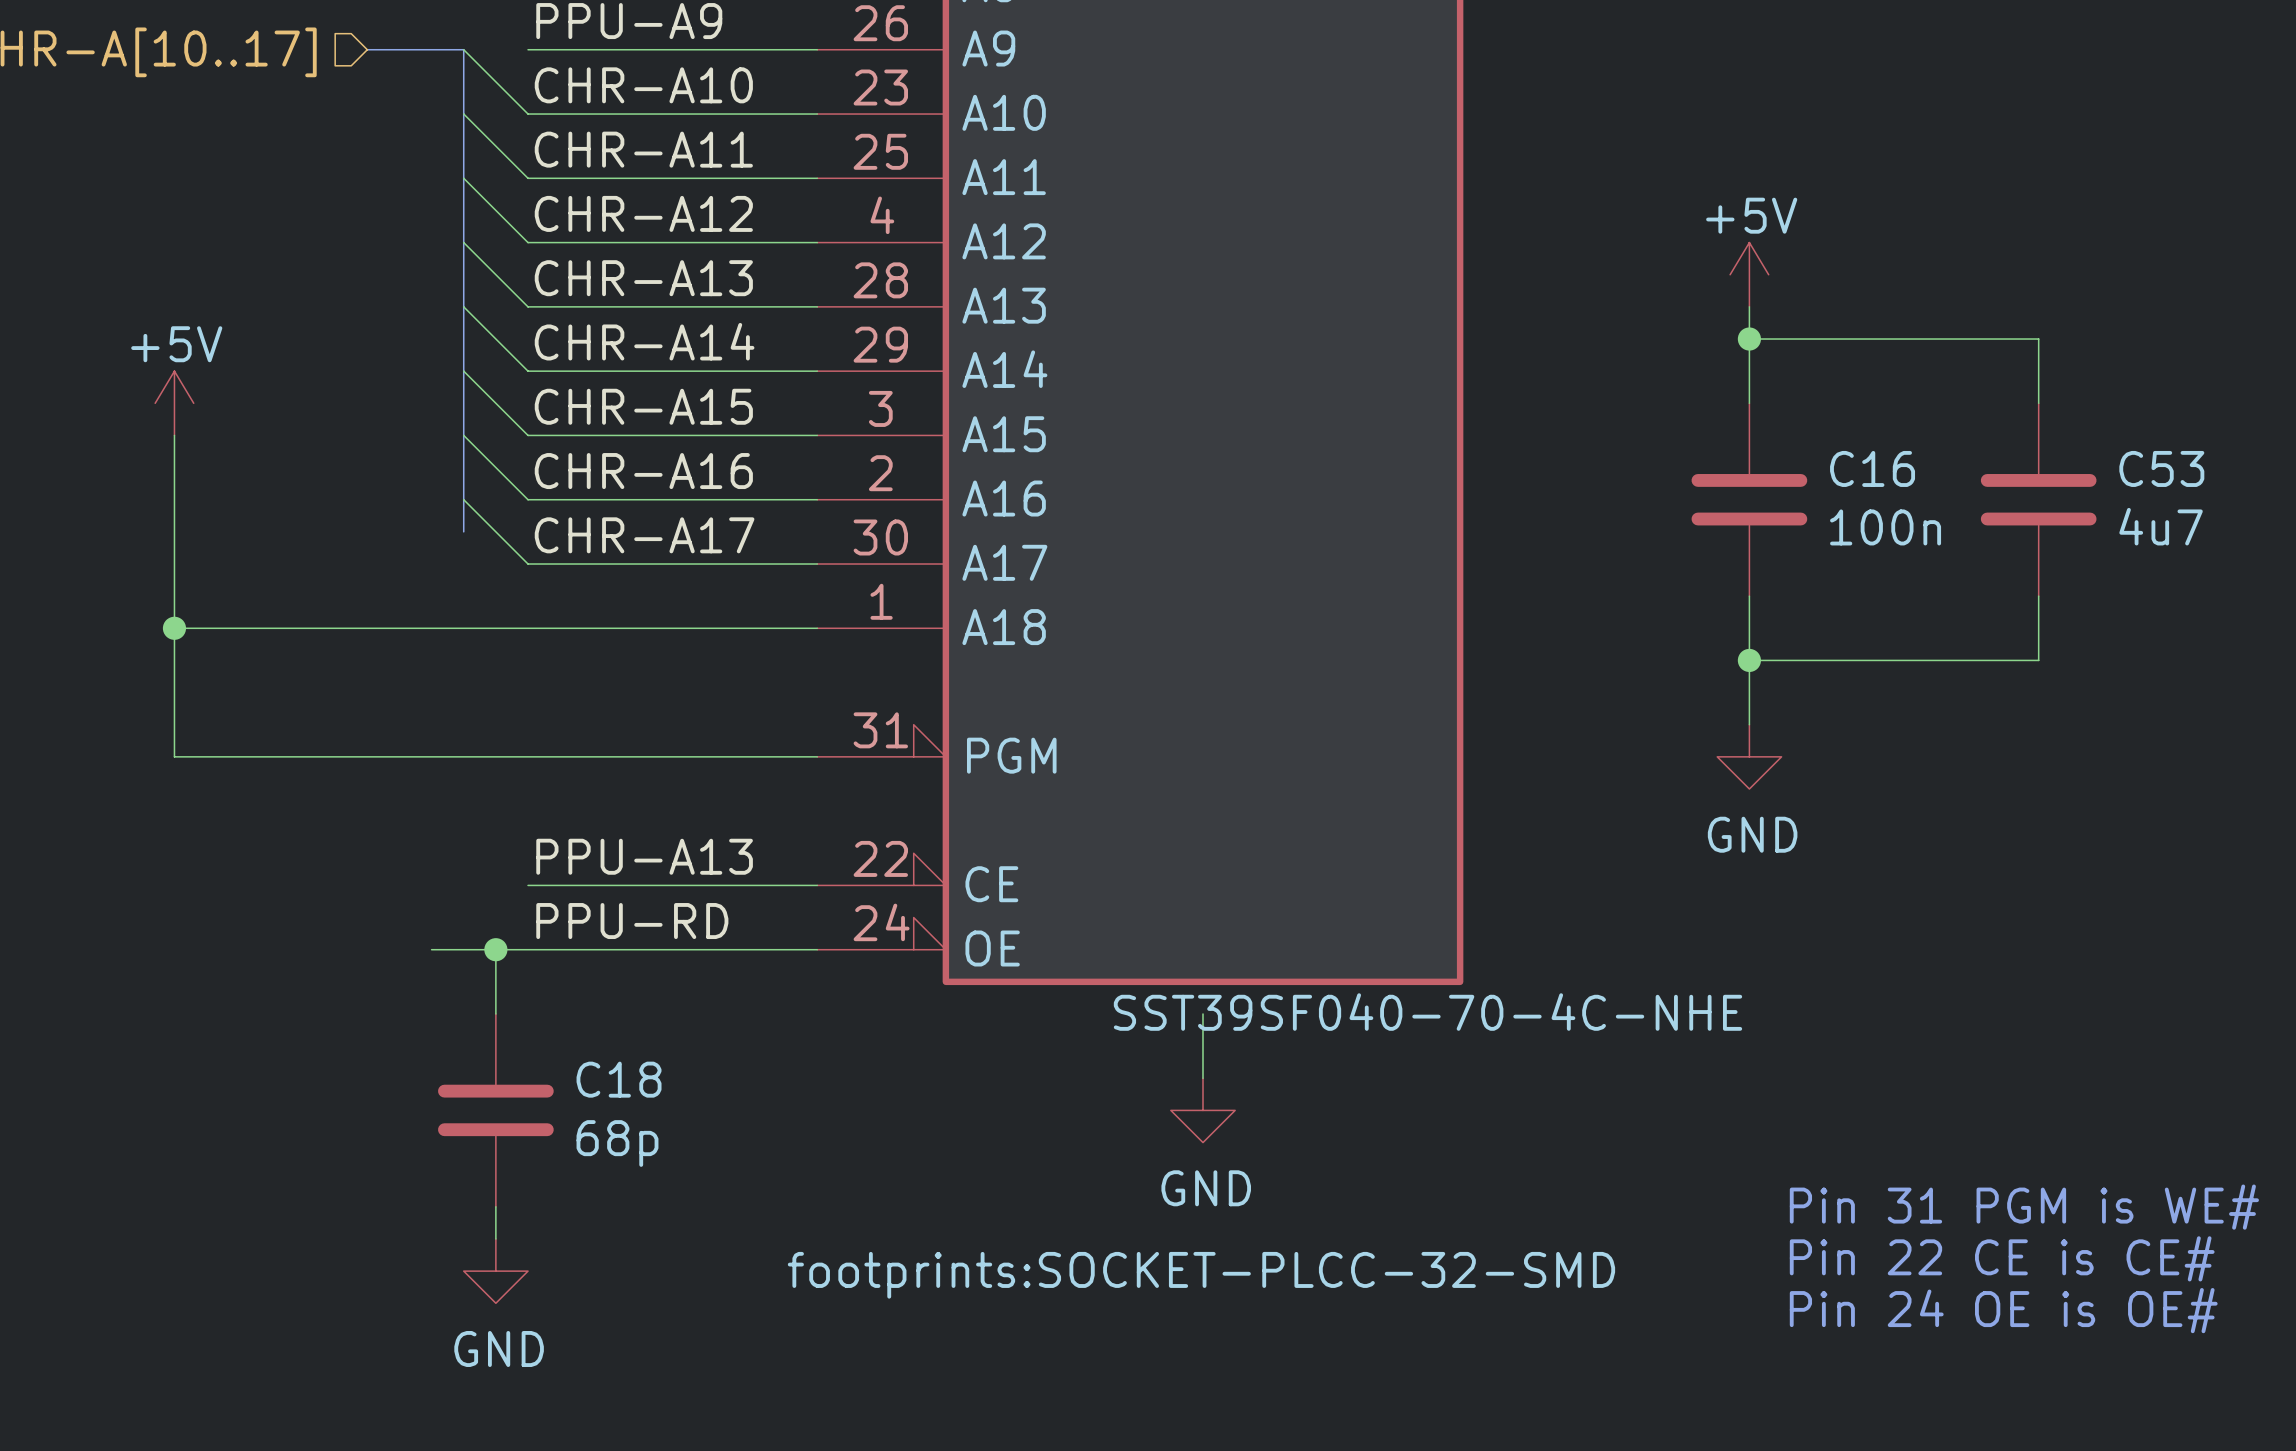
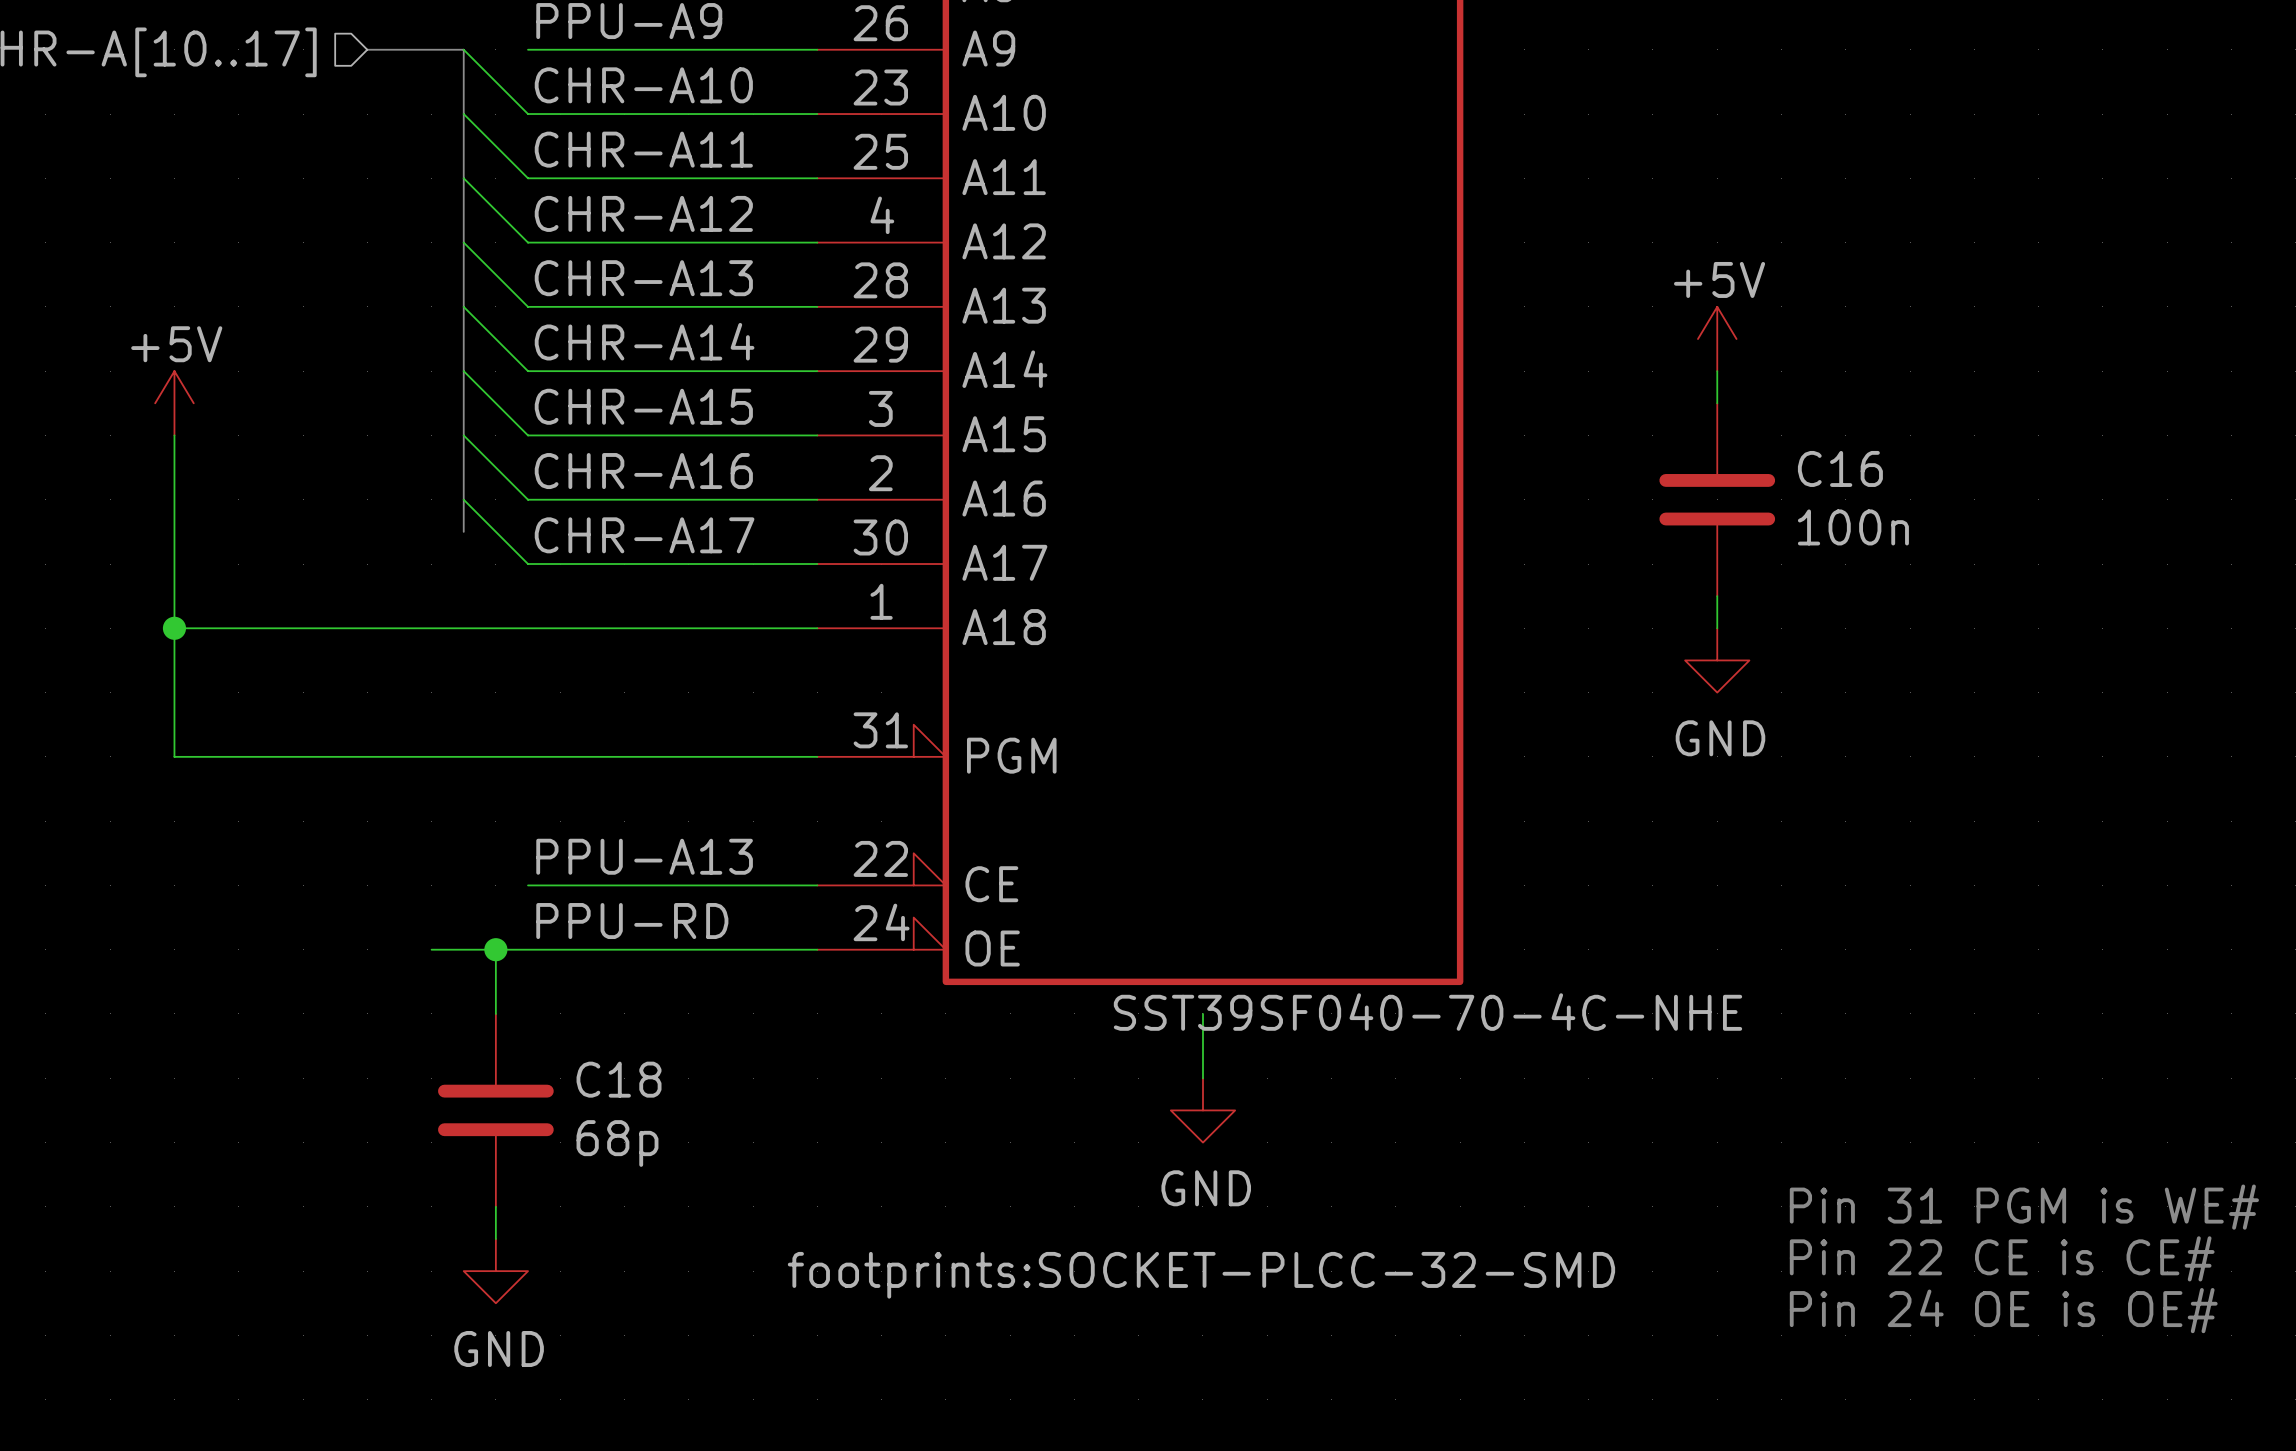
power symbol position: +5V (1749, 274) -> +5V (1717, 339)
wire: (1749, 306) (1749, 403) -> none
wire: (1749, 339) (2038, 339) (2038, 403) -> none
junction: (1749, 339) -> none
wire: none -> (1717, 371) (1717, 403)
C16 position: (1749, 499) -> (1717, 499)
C53: 4u7 (2038, 499) -> none
wire: none -> (1717, 596) (1717, 628)
wire: (1749, 596) (1749, 724) -> none
wire: (2038, 596) (2038, 660) (1749, 660) -> none
junction: (1749, 660) -> none
power symbol position: GND (1749, 756) -> GND (1717, 660)

